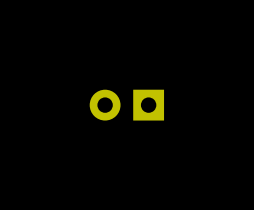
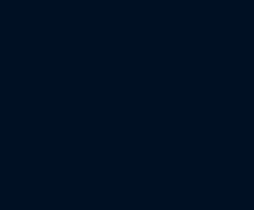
part: (126, 105) -> none

